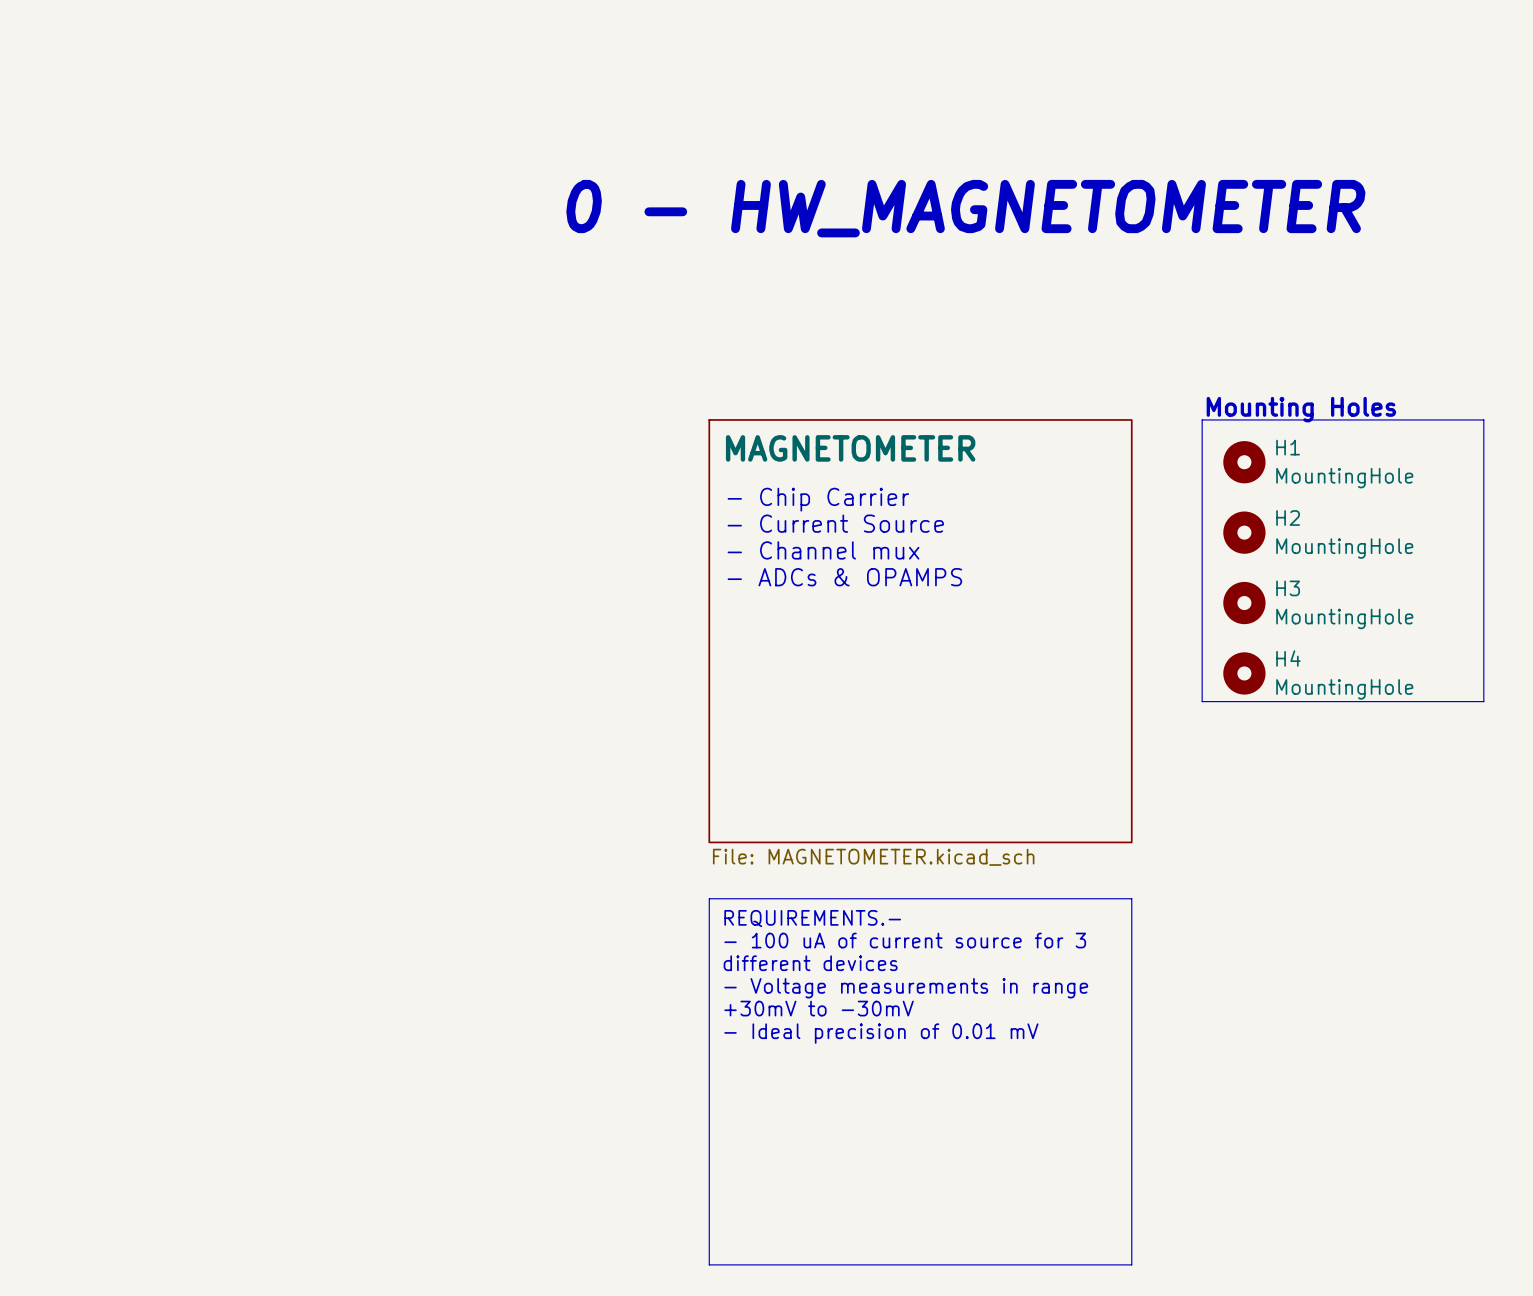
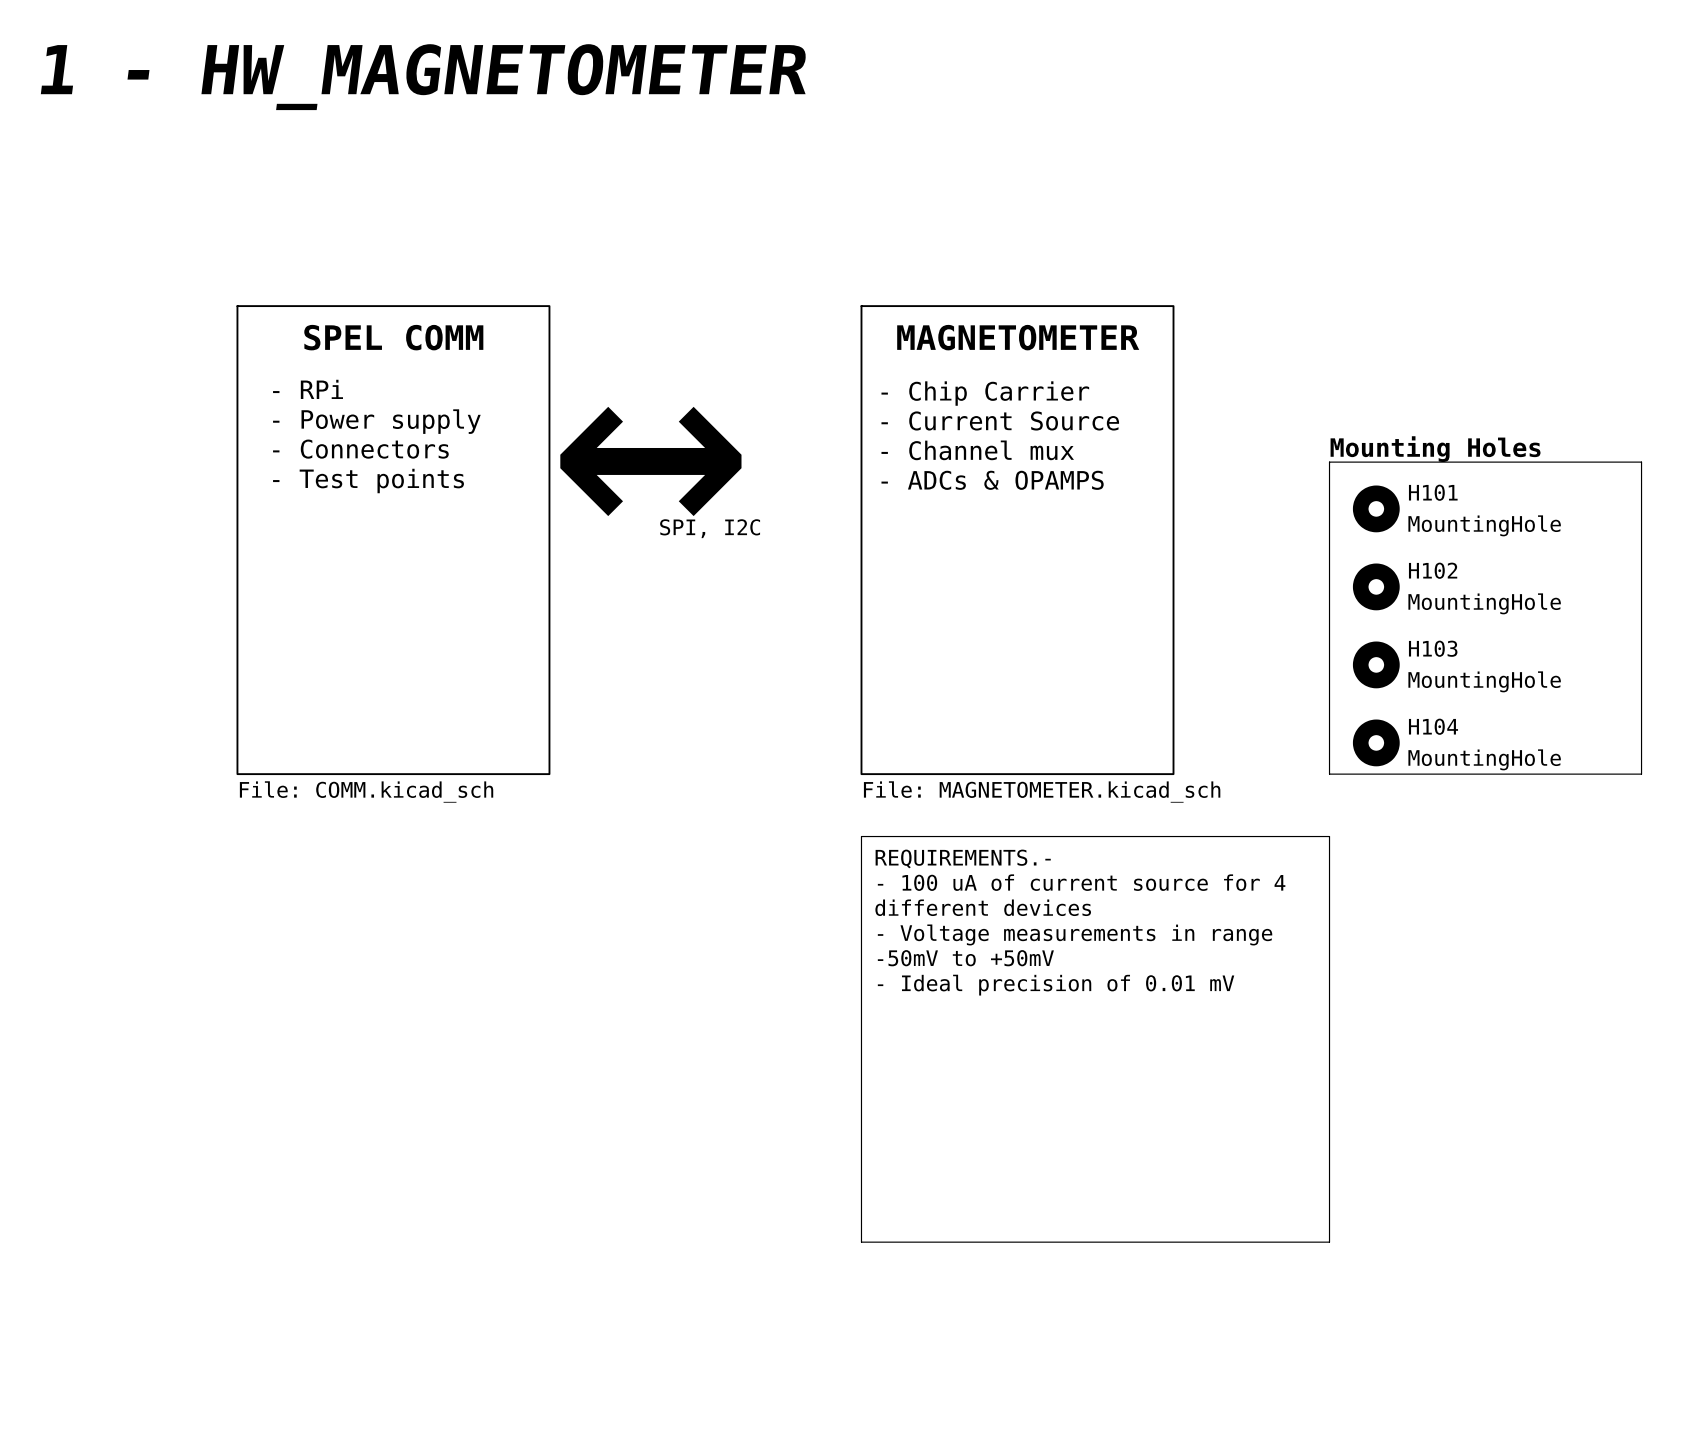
text: none -> 1 - HW_MAGNETOMETER (423, 77)
text: 0 - HW_MAGNETOMETER (965, 208) -> none
text: none -> - RPi (308, 389)
text: none -> - Power supply (376, 421)
text: none -> - Connectors (360, 449)
text: none -> ↔ (650, 461)
text: none -> - Test points (368, 481)
H1 name: H1 (1288, 447) -> H101 (1433, 492)
text: none -> SPI, I2C (710, 528)
sheet SPEL COMM: none -> File: COMM.kicad_sch (393, 540)
sheet MAGNETOMETER: none -> File: MAGNETOMETER.kicad_sch (1017, 540)
text position: - Chip Carrier (818, 499) -> - Chip Carrier (985, 393)
H2 name: H2 (1288, 518) -> H102 (1433, 570)
text position: - Current Source (835, 523) -> - Current Source (1000, 420)
text position: - Channel mux (823, 550) -> - Channel mux (977, 450)
text position: - ADCs & OPAMPS (844, 577) -> - ADCs & OPAMPS (992, 480)
H3 name: H3 (1288, 588) -> H103 (1433, 648)
sheet MAGNETOMETER: File: MAGNETOMETER.kicad_sch (920, 631) -> none
H4 name: H4 (1288, 658) -> H104 (1433, 726)
text: none -> - 100 uA of current source for 4 (1081, 882)
text: none -> -50mV to +50mV (965, 958)
line: (709, 898) (1131, 898) (1131, 1264) (709, 1264) (709, 898) -> (861, 836) (1329, 836) (1329, 1242) (861, 1242) (861, 836)
text position: REQUIREMENTS.- (812, 918) -> REQUIREMENTS.- (963, 858)
text: - 100 uA of current source for 3 (905, 940) -> none
text position: different devices (810, 963) -> different devices (983, 907)
text position: - Voltage measurements in range (906, 988) -> - Voltage measurements in range (1075, 934)
text: +30mV to -30mV (819, 1008) -> none
text position: - Ideal precision of 0.01 mV (881, 1033) -> - Ideal precision of 0.01 mV (1056, 985)

